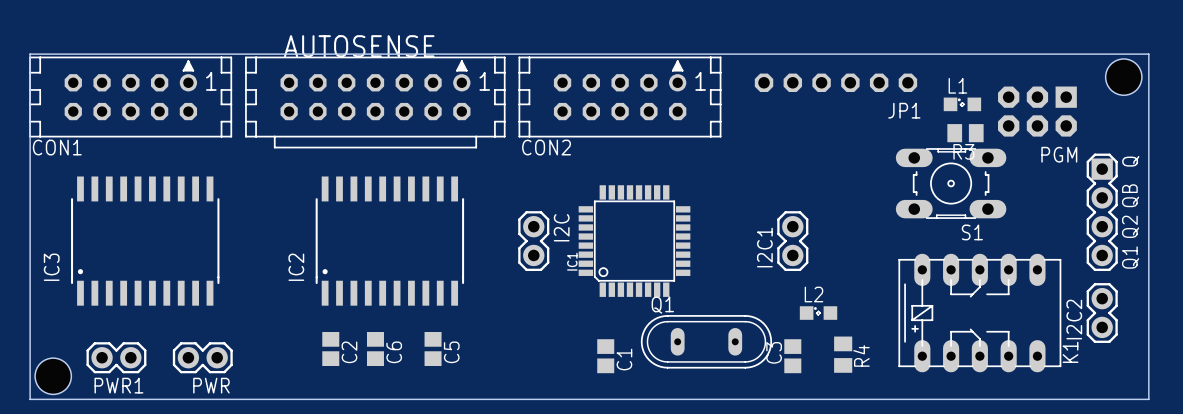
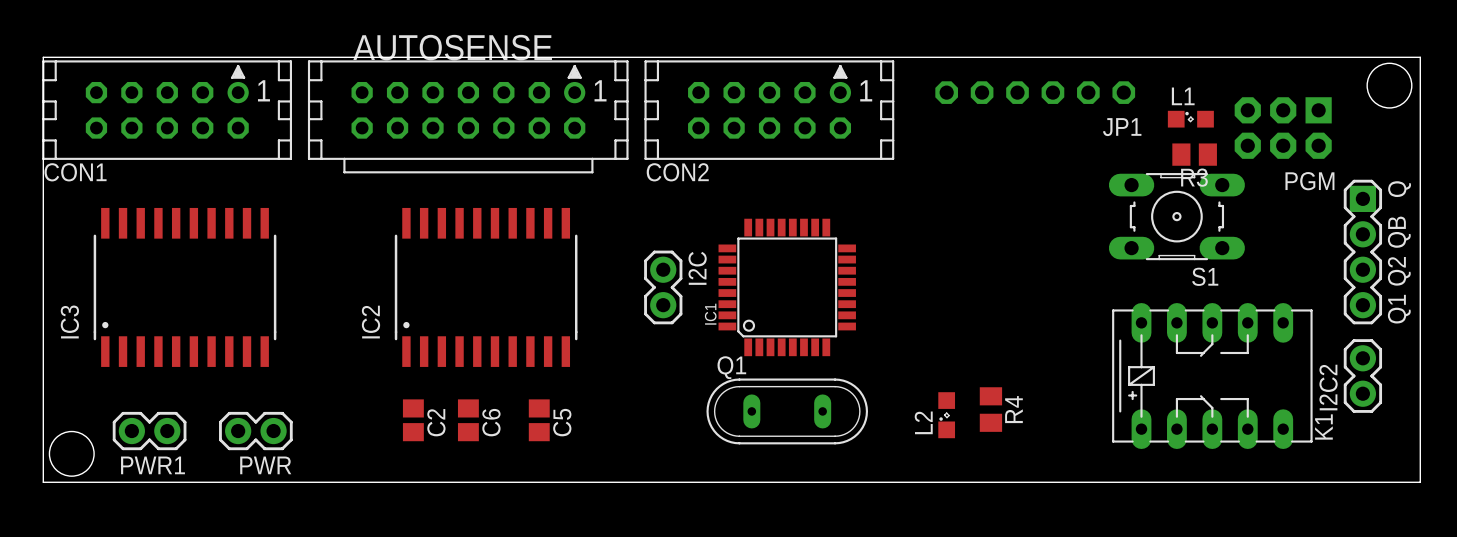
I2C1: (792, 241) -> none
L2 rotation: 0° (818, 313) -> 90° counterclockwise (946, 415)
L2 position: (818, 313) -> (946, 415)
Q1 position: (706, 341) -> (787, 411)
R4 position: (843, 354) -> (990, 409)
C1: (605, 356) -> none
C3: (792, 356) -> none

